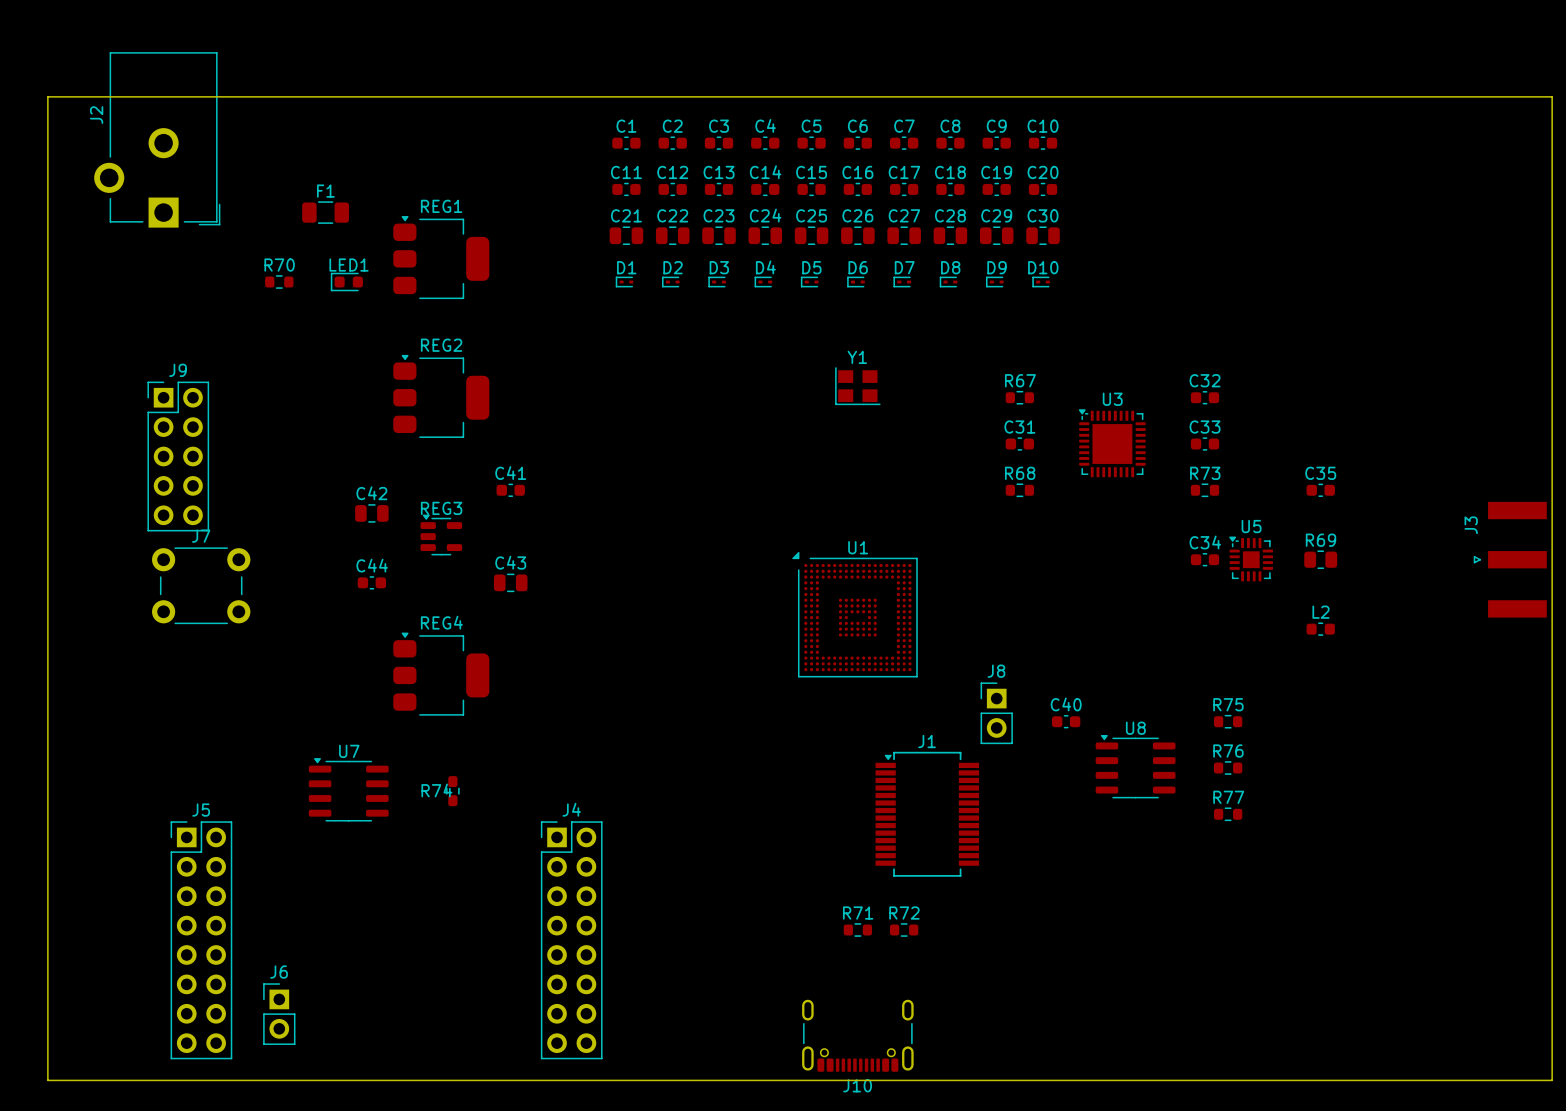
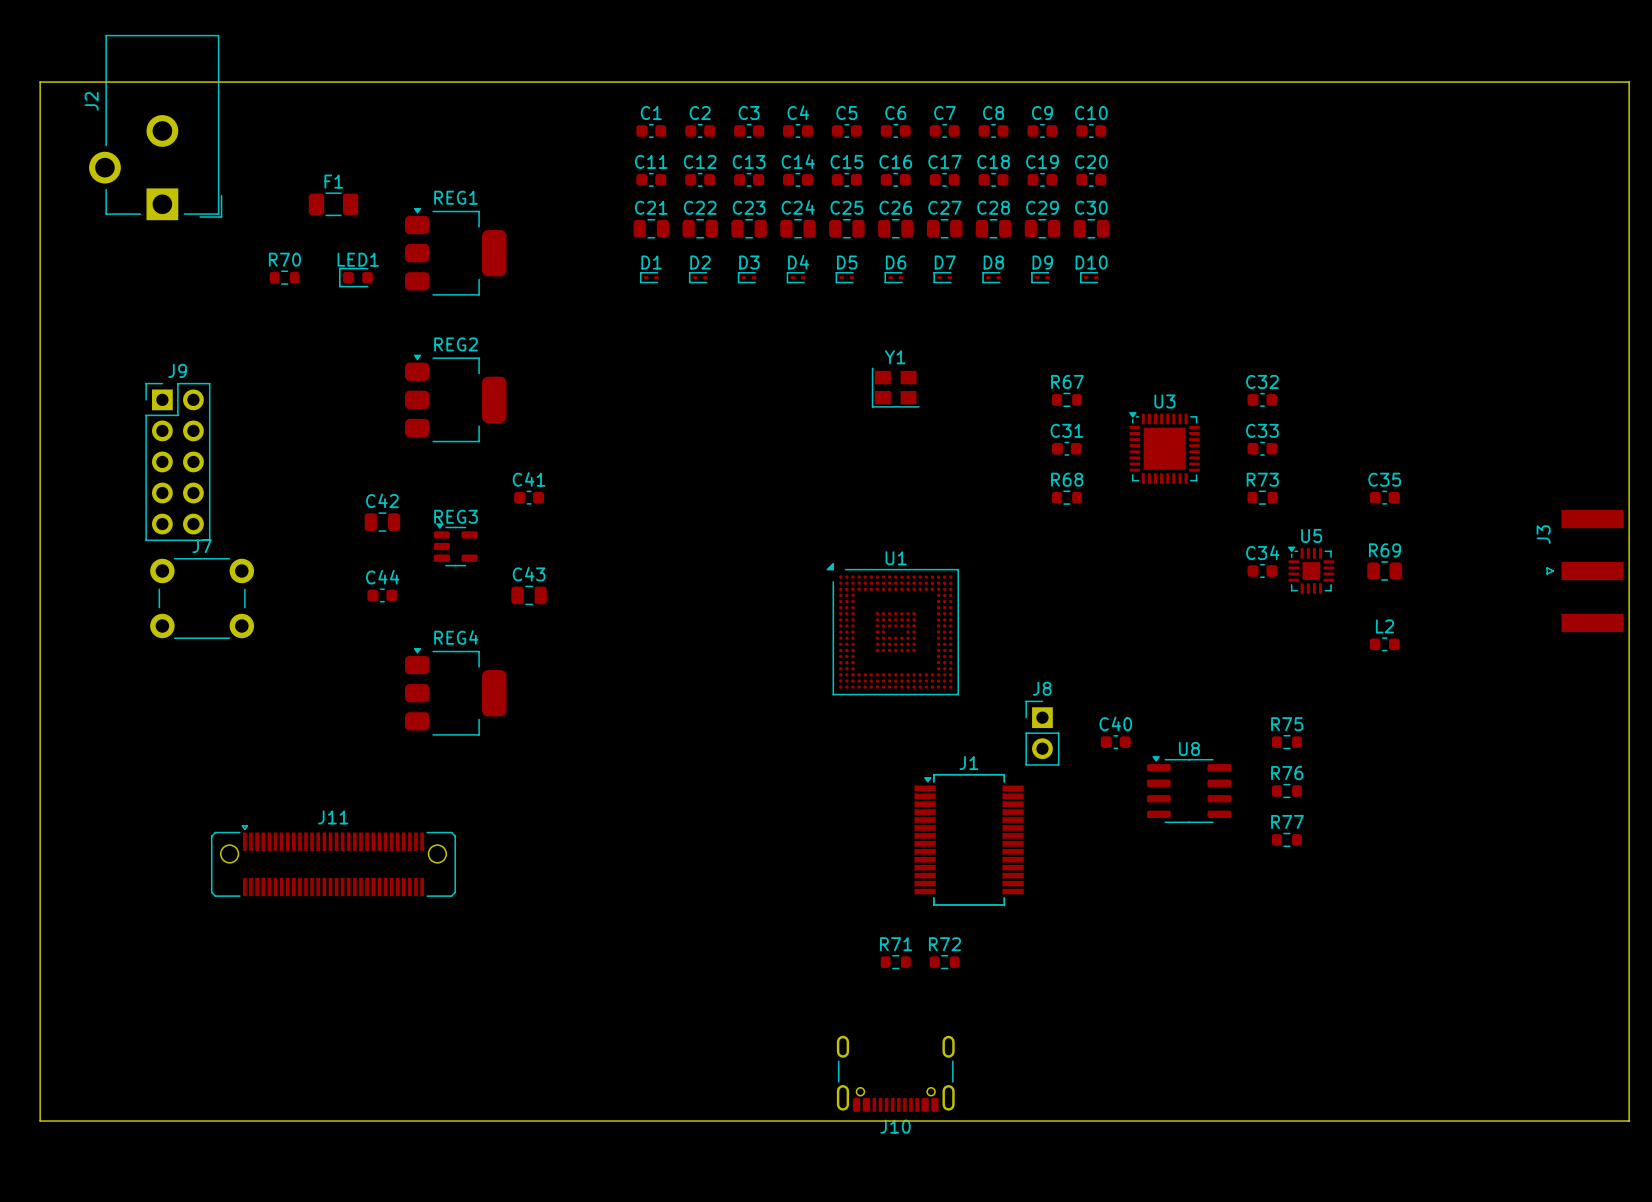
U7: (348, 789) -> none
R74: (452, 791) -> none
J11: none -> (333, 861)
J5: (201, 940) -> none
J4: (571, 940) -> none
J6: (279, 1014) -> none

